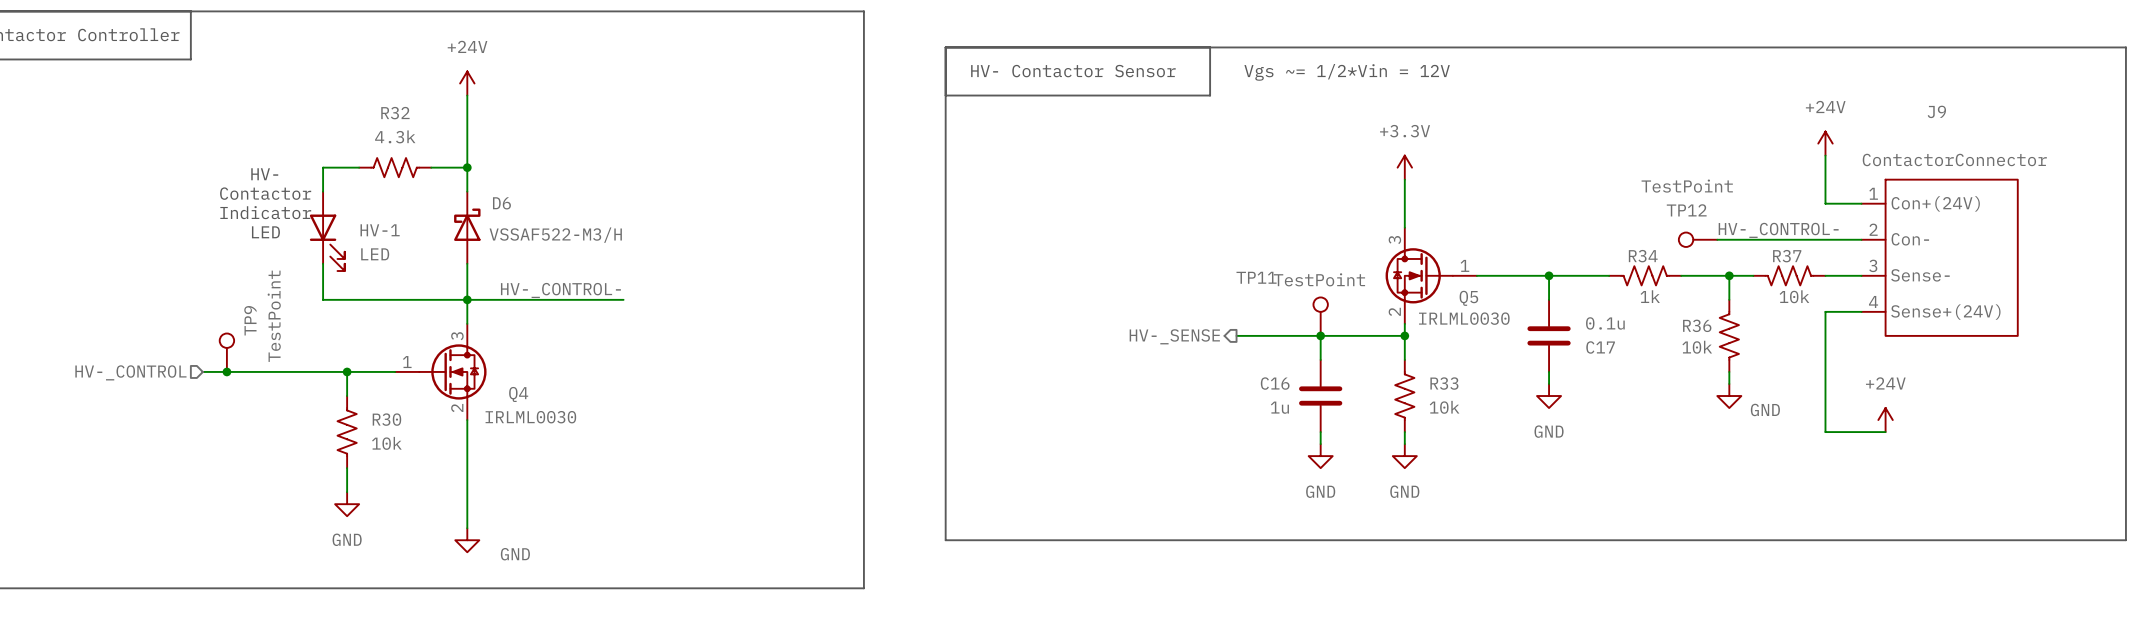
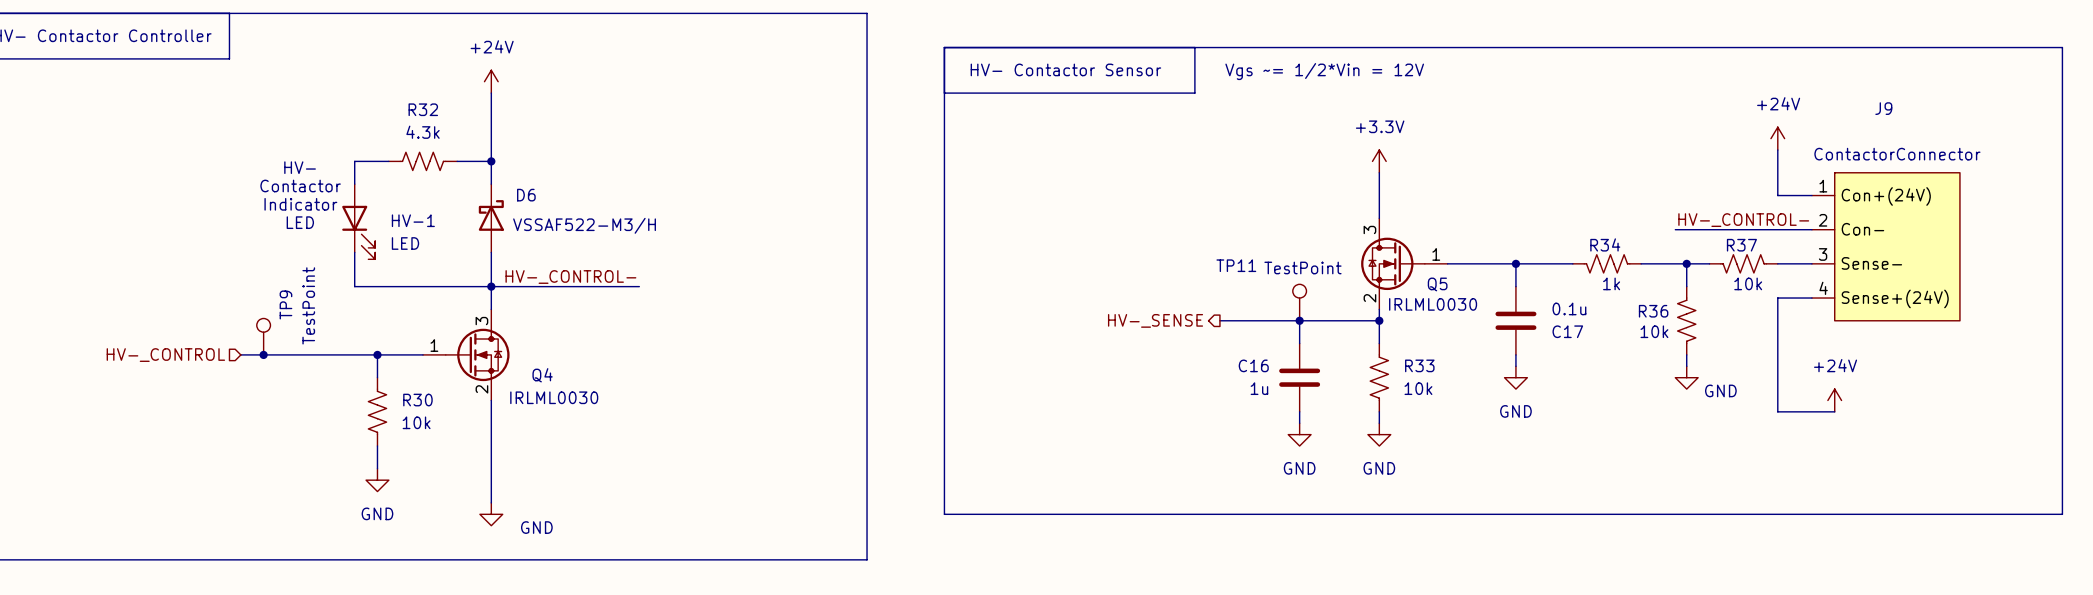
TP12: TestPoint (1698, 239) -> none

